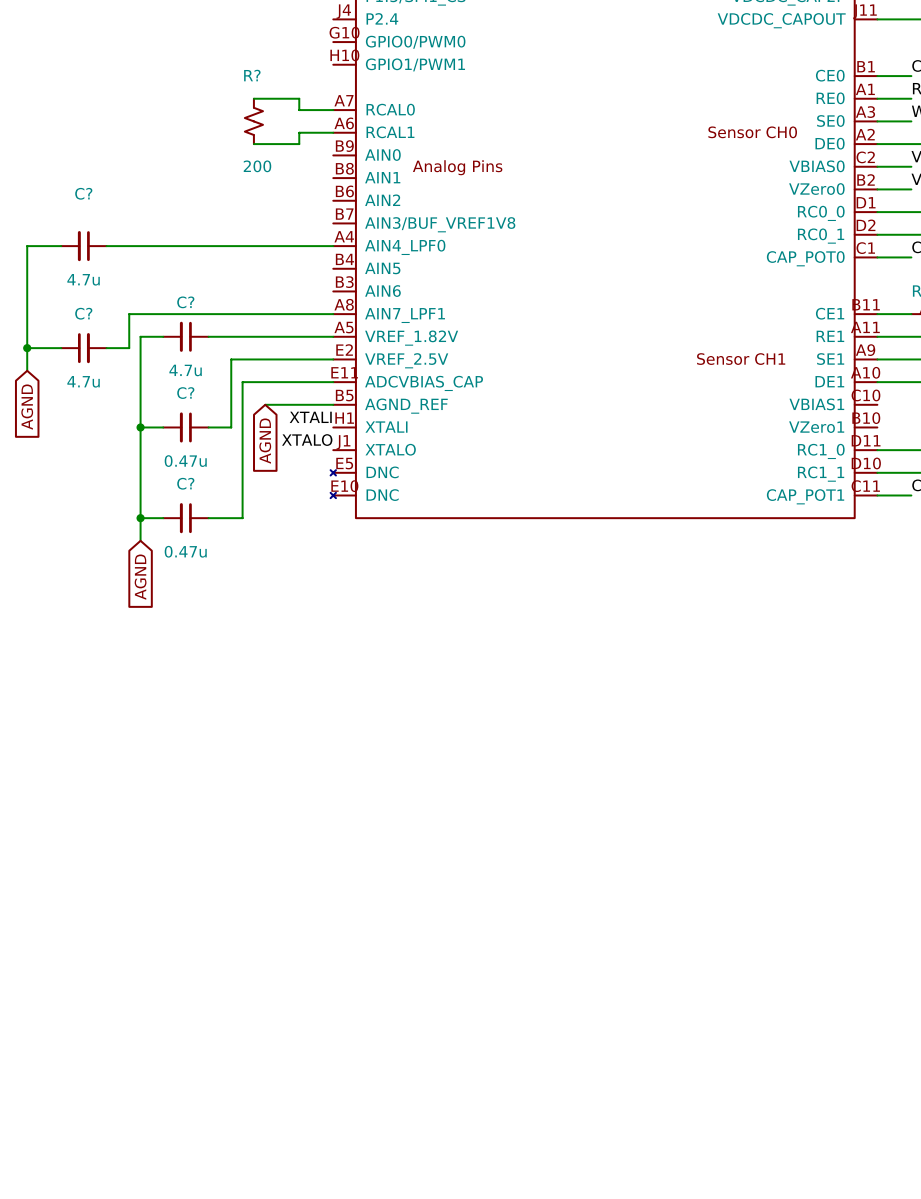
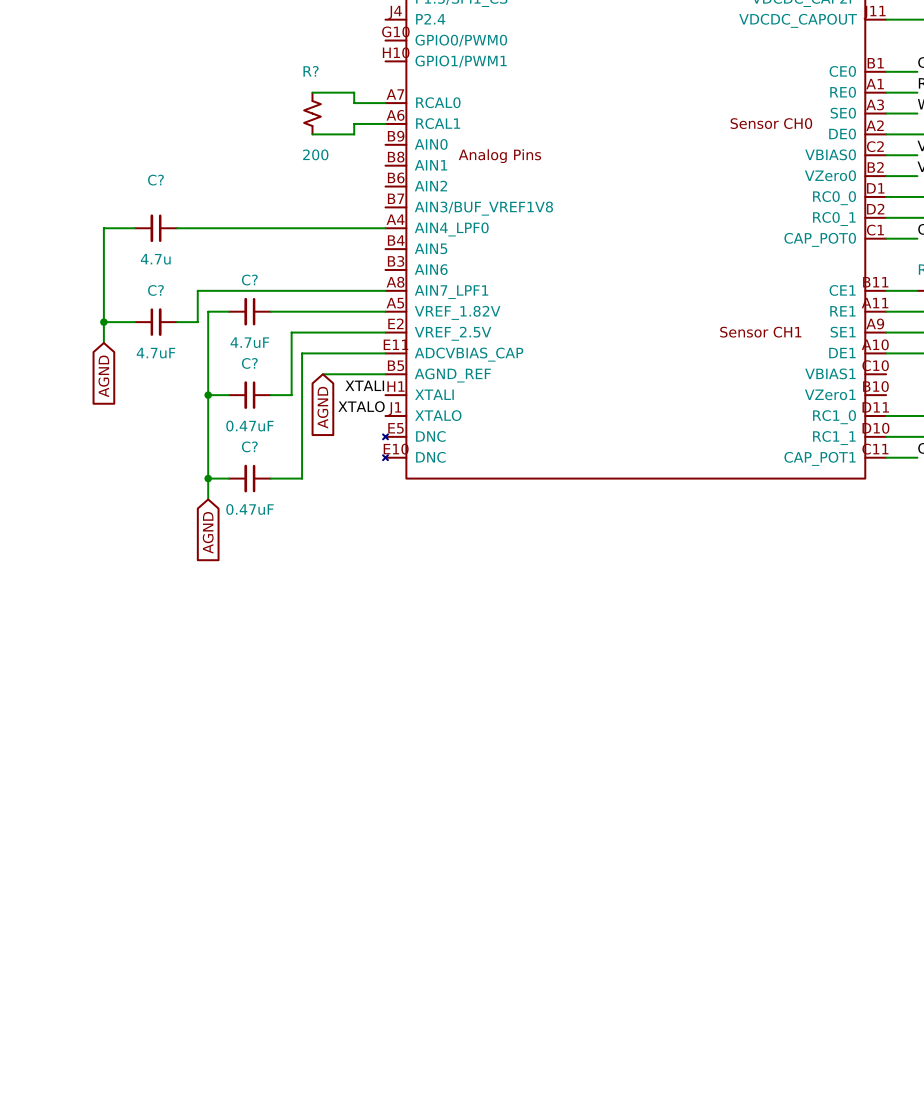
C? value: 4.7u (185, 370) -> 4.7uF (249, 342)
C? value: 4.7u (83, 381) -> 4.7uF (155, 353)
C? value: 0.47u (185, 461) -> 0.47uF (249, 426)
C? value: 0.47u (185, 551) -> 0.47uF (249, 509)

